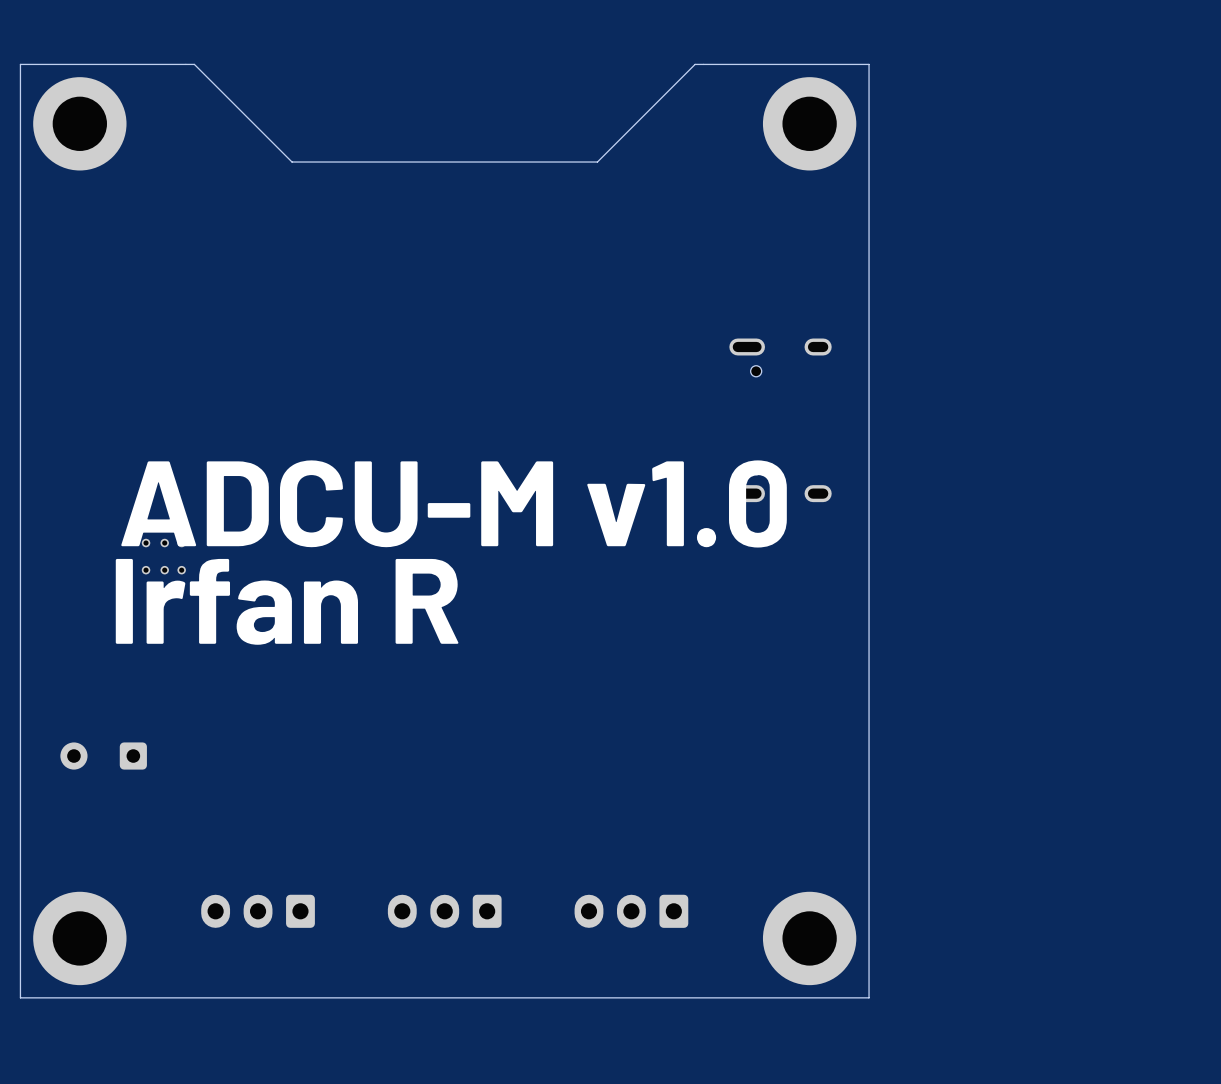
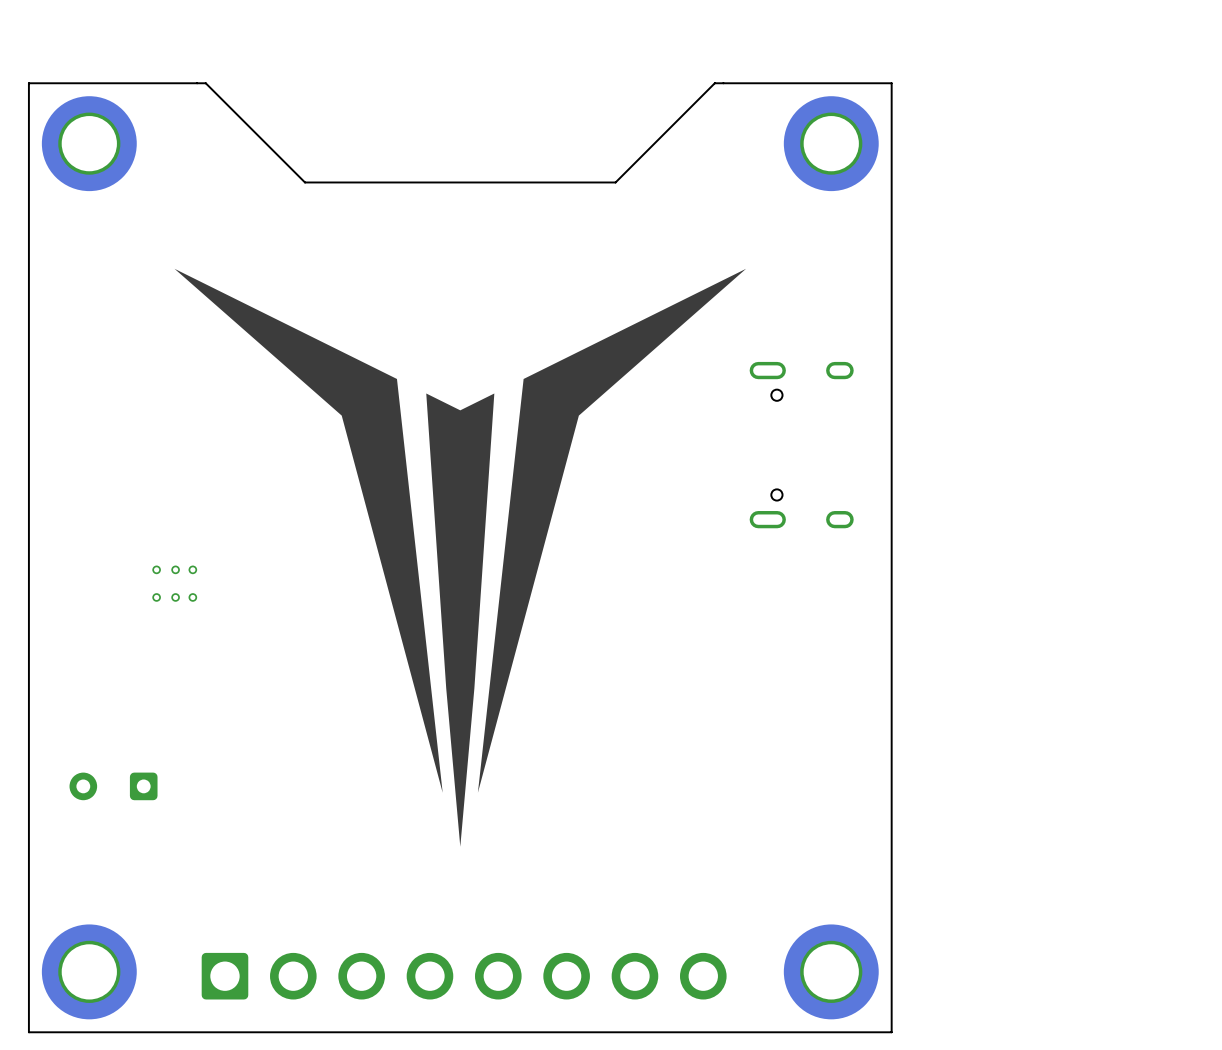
drawing: none -> [174, 268, 747, 847]
text: ADCU-M v1.0 (454, 503) -> none
text: Irfan R (287, 601) -> none
part: (258, 911) -> none
part: (444, 911) -> none
part: (631, 911) -> none
part: none -> (464, 976)

